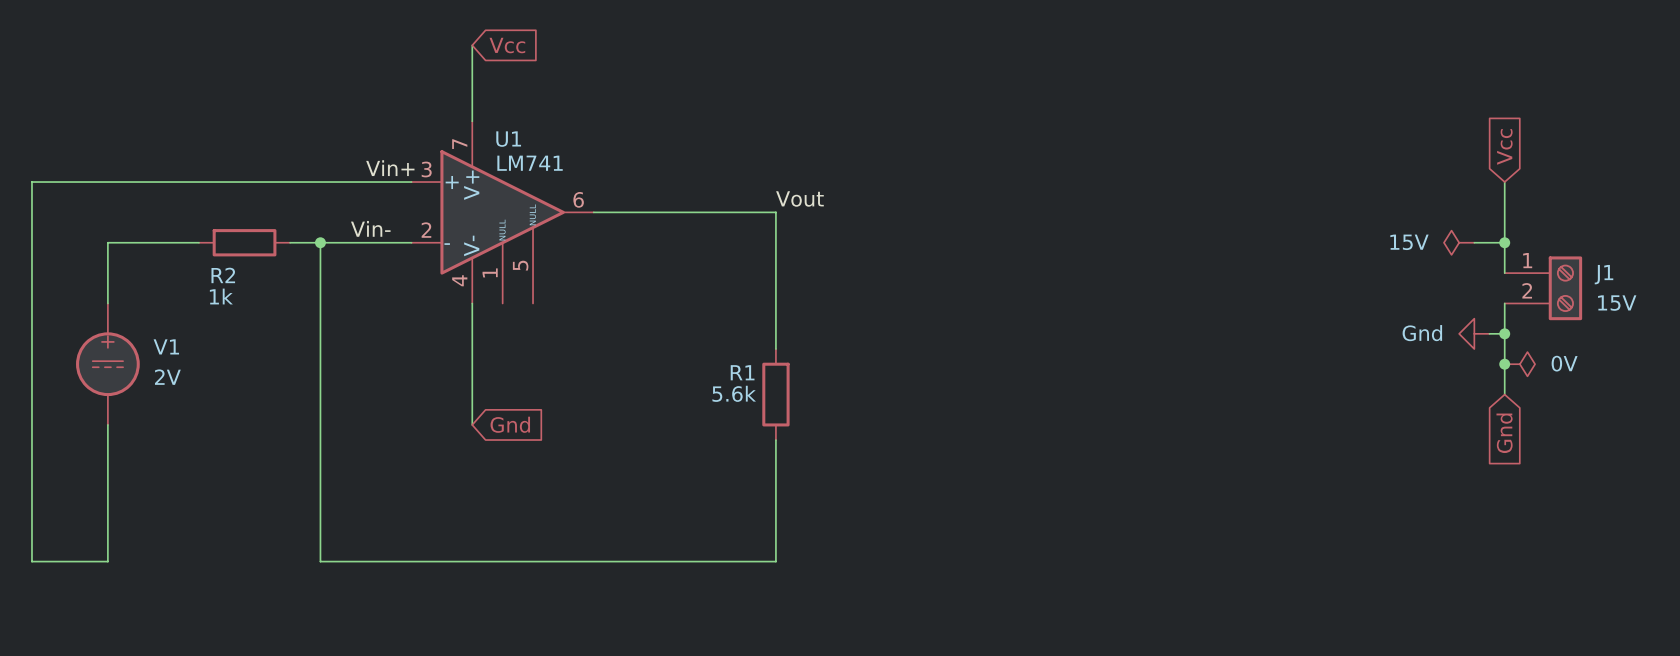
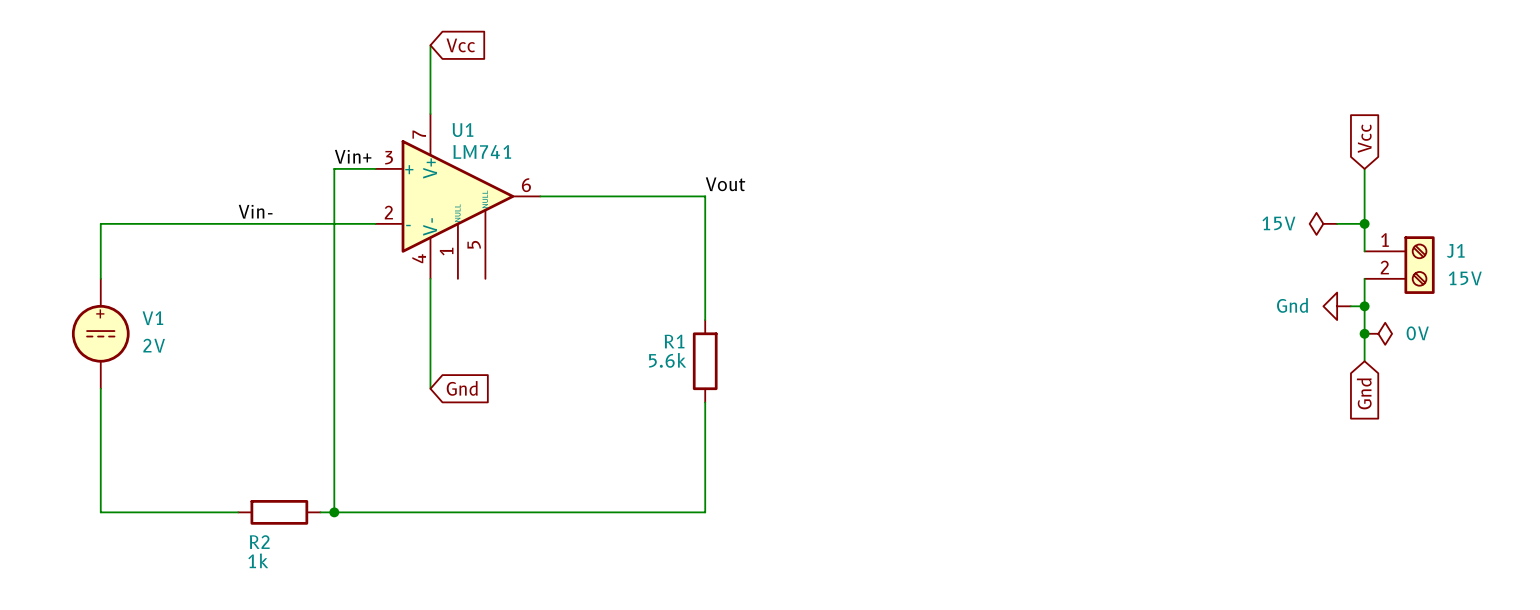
wire: (366, 182) (31, 182) (31, 561) (107, 561) -> (334, 168) (334, 512)
label position: Vin- (370, 228) -> Vin- (255, 211)
wire: none -> (183, 223) (265, 223)
R2 position: (244, 242) -> (279, 512)
wire: (320, 242) (320, 561) (350, 561) -> none
junction: (320, 242) -> none
wire: none -> (100, 512) (238, 512)
junction: none -> (334, 512)

